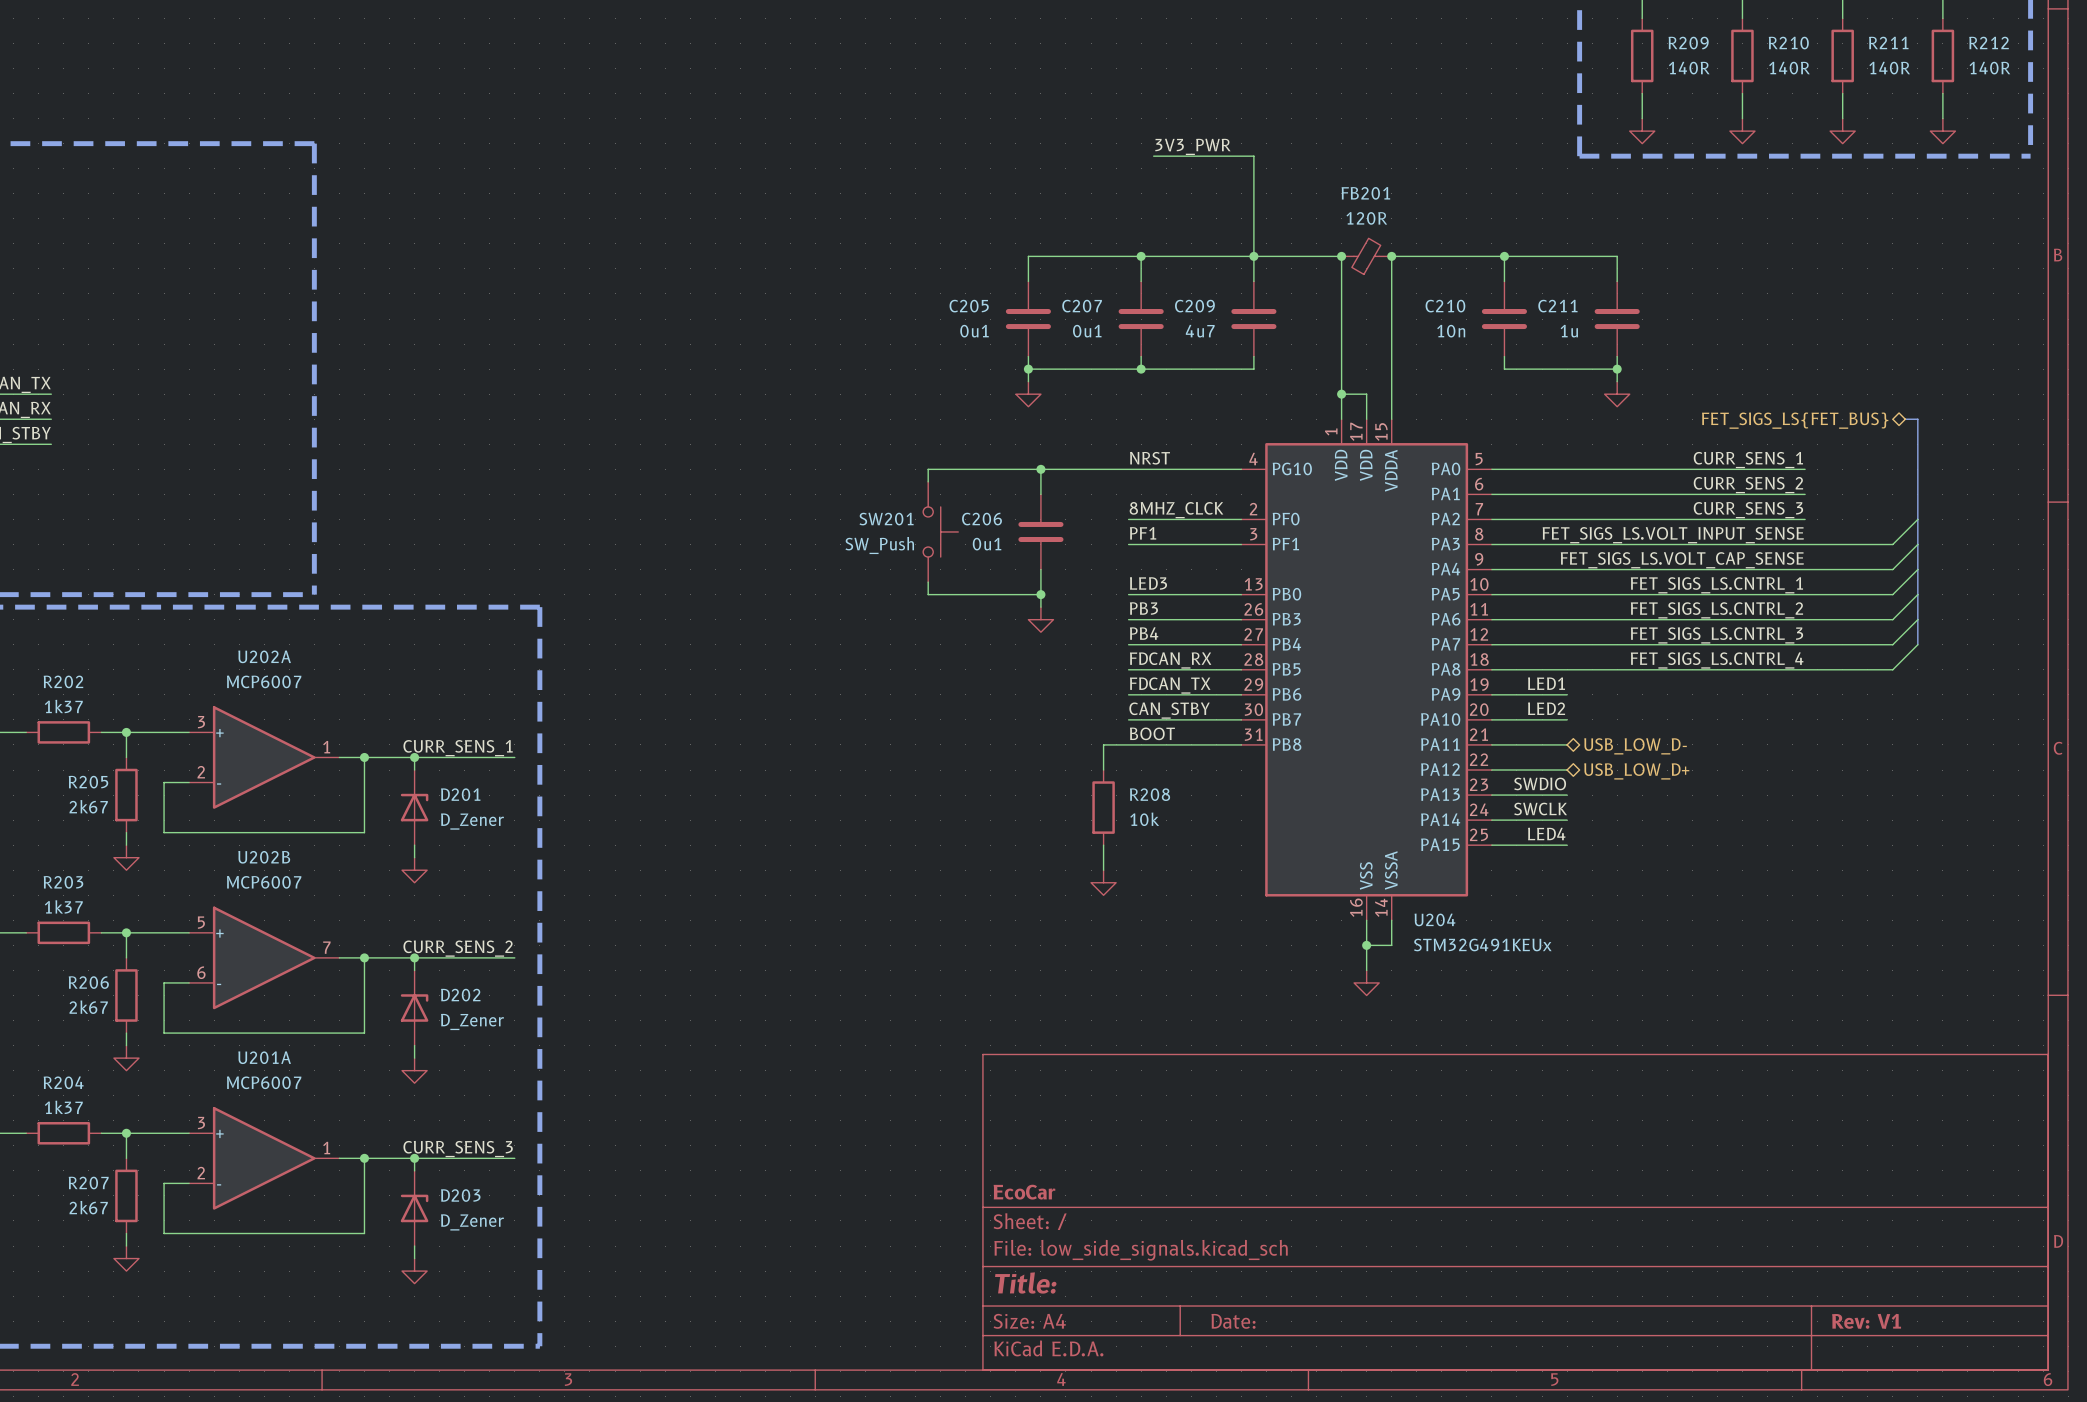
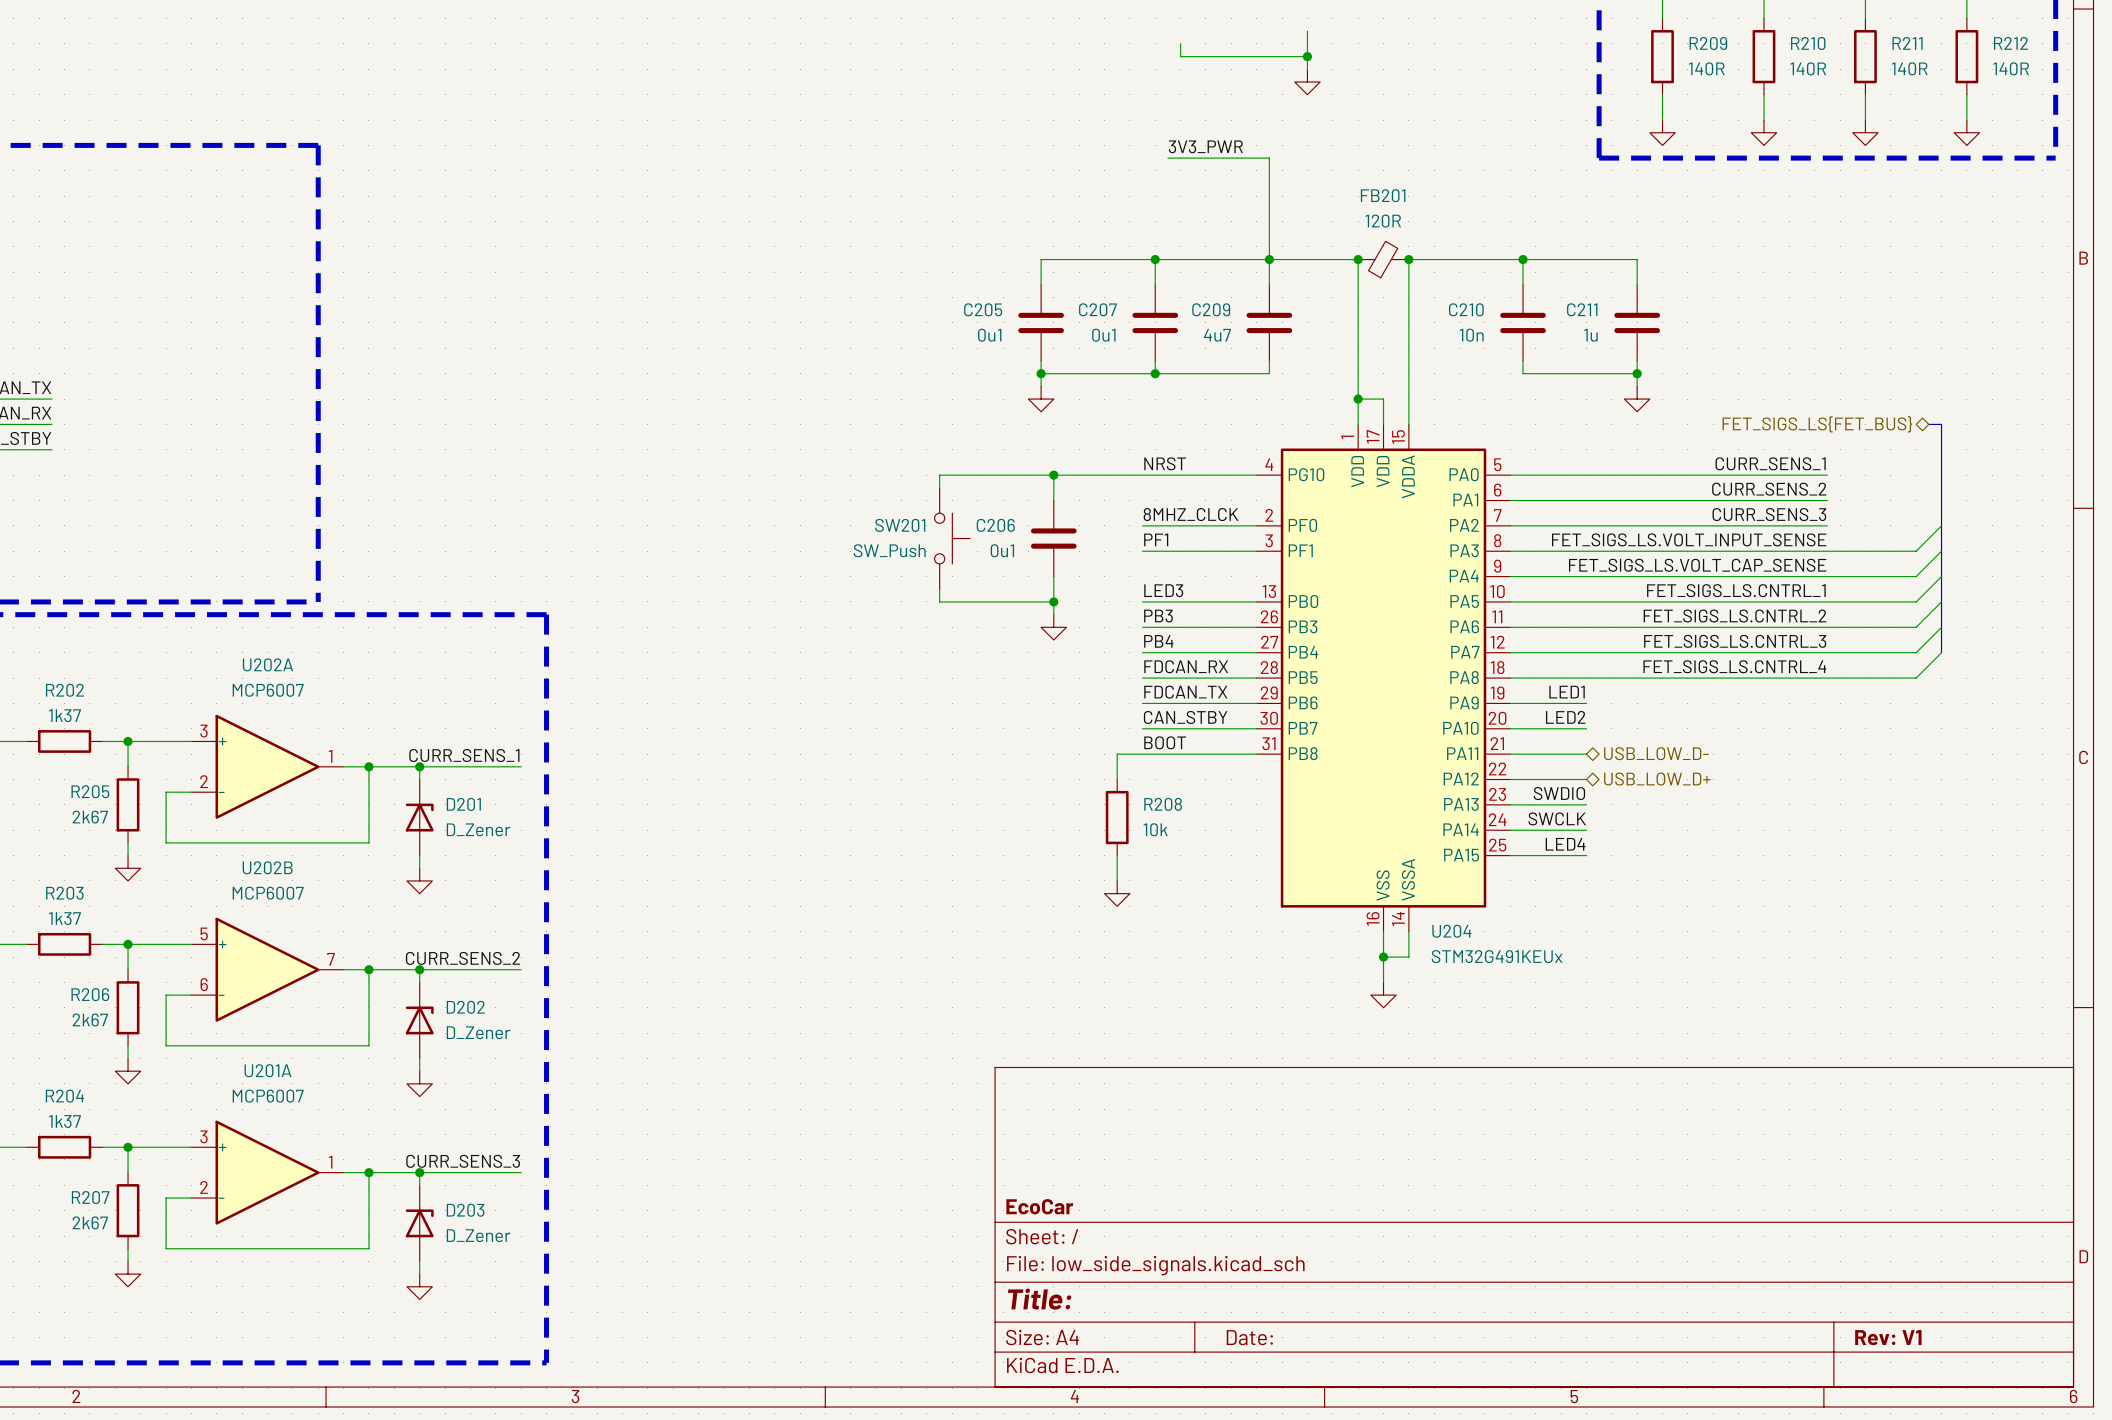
wire: none -> (1307, 31) (1307, 69)
wire: none -> (1180, 43) (1180, 56) (1307, 56)
junction: none -> (1307, 56)
power symbol: none -> (1307, 82)

